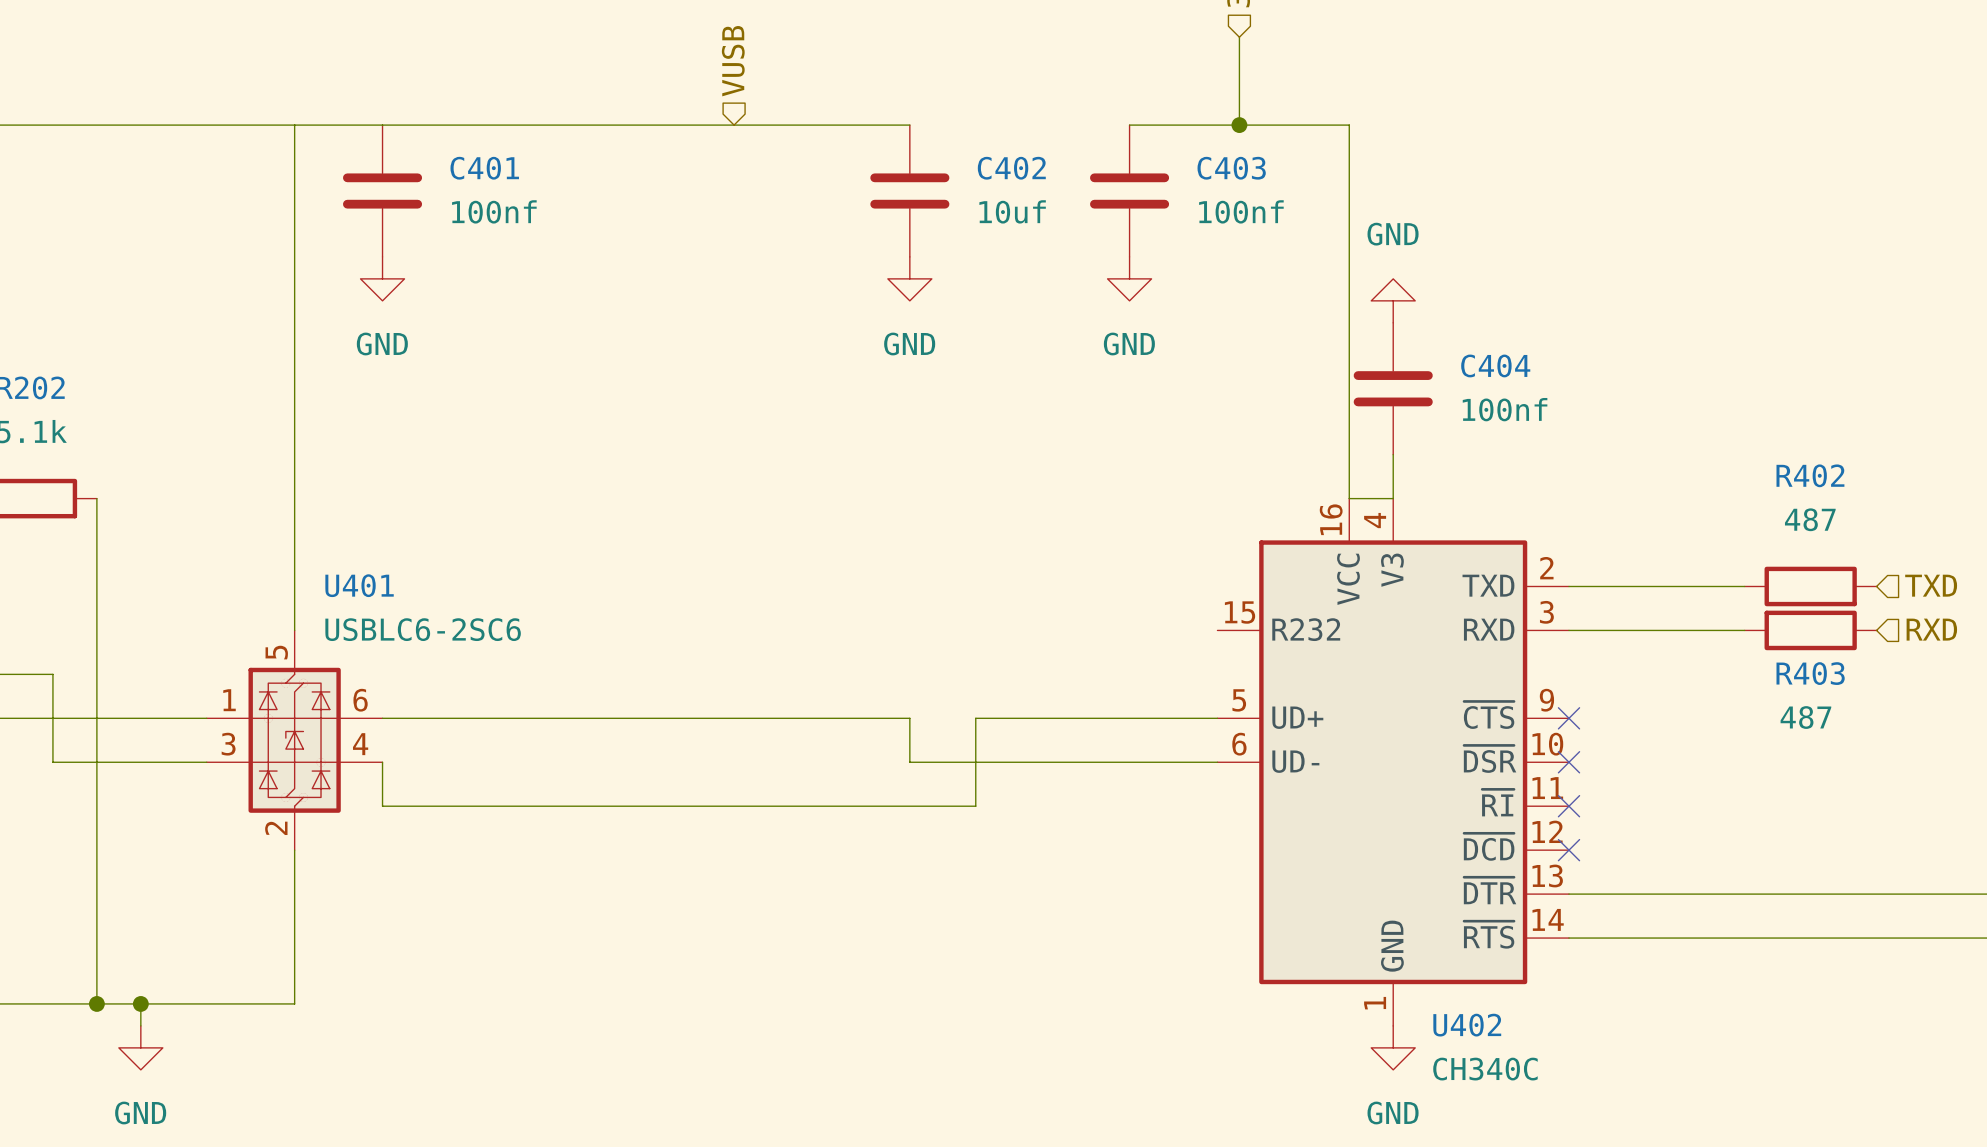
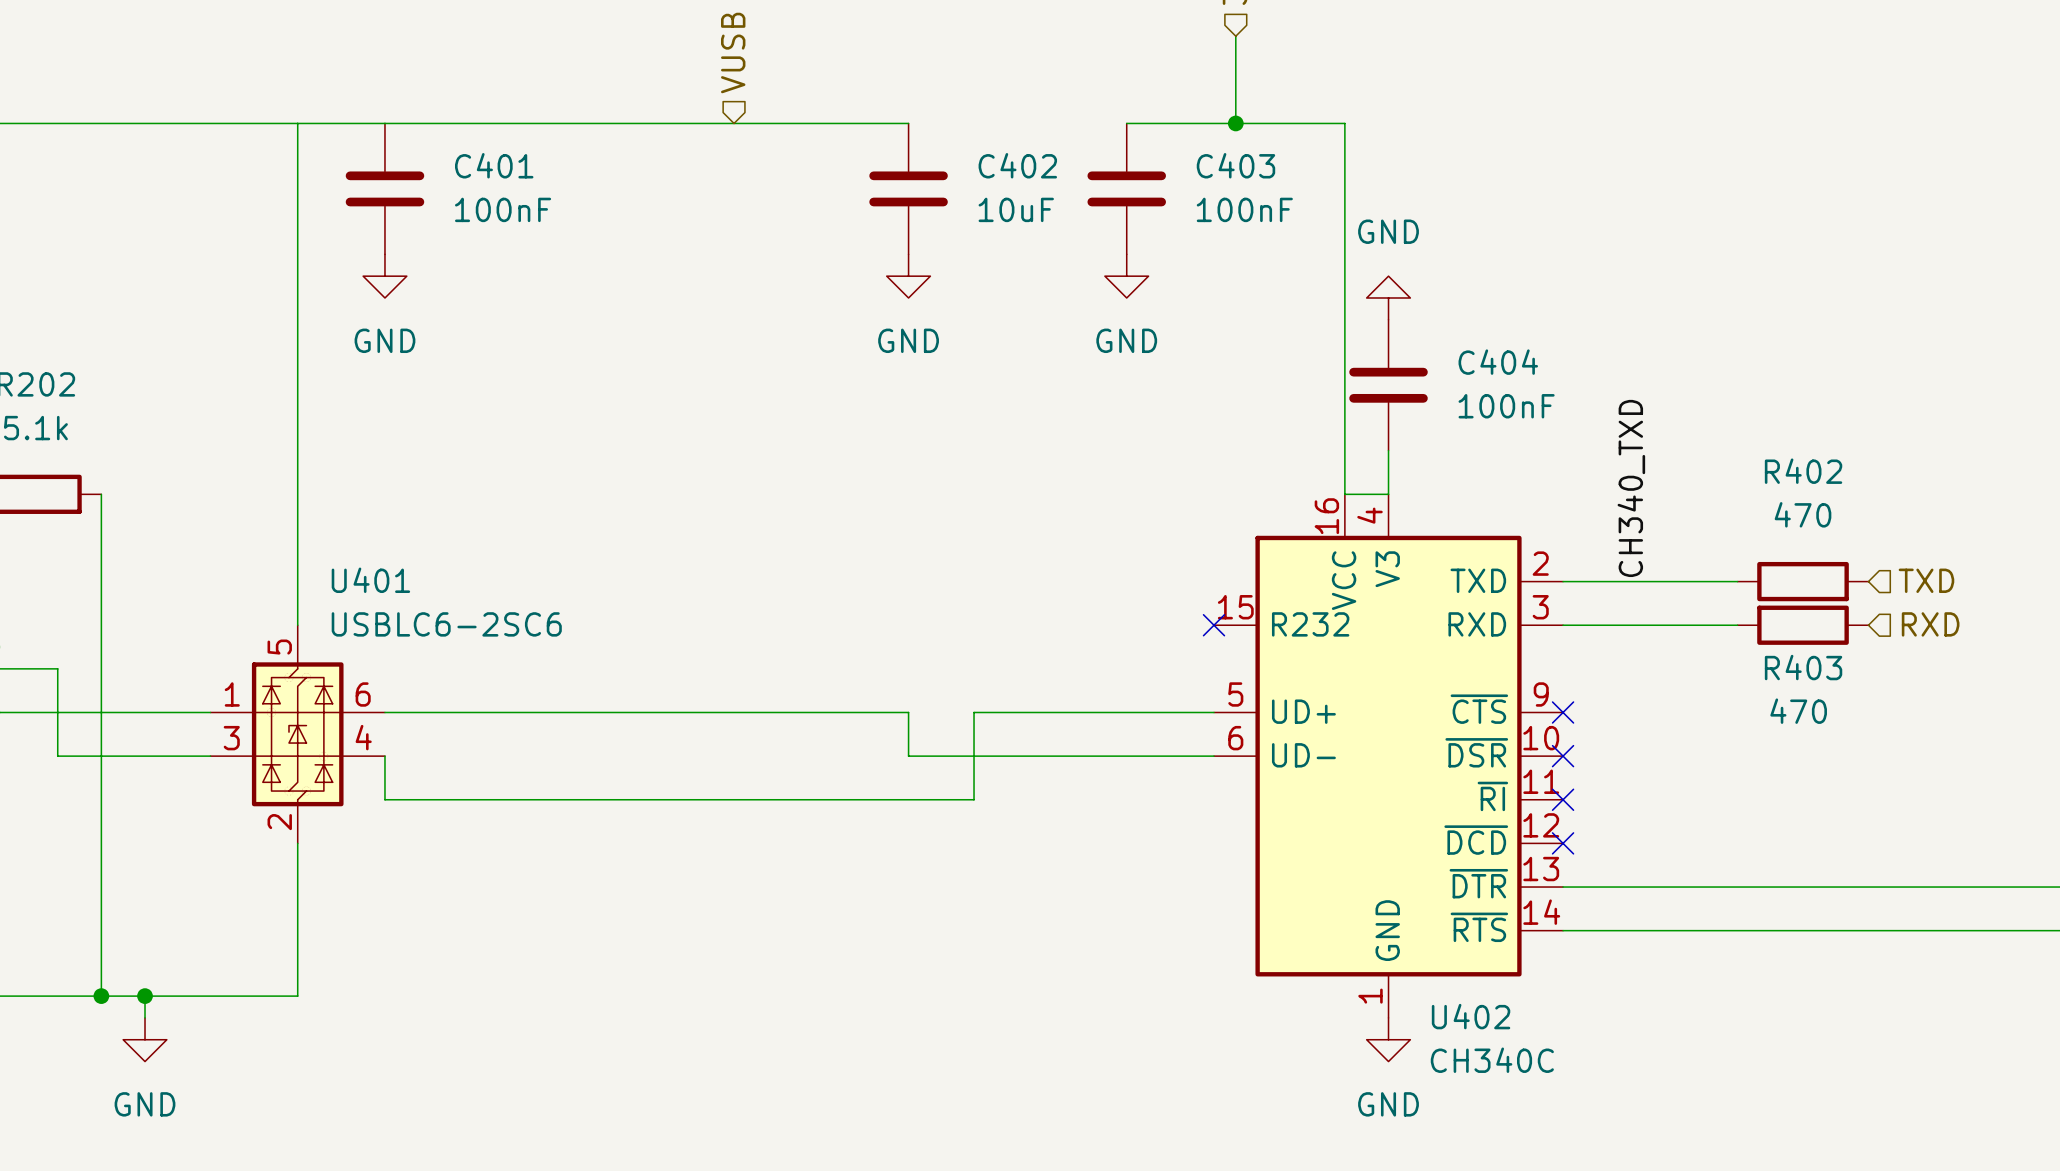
C401 value: 100nf (494, 211) -> 100nF (503, 209)
C402 value: 10uf (1012, 211) -> 10uF (1016, 209)
C403 value: 100nf (1241, 211) -> 100nF (1244, 209)
C404 value: 100nf (1505, 409) -> 100nF (1506, 406)
label: none -> CH340_TXD (1631, 488)
R402 value: 487 (1810, 519) -> 470 (1803, 514)
no-connect mark: none -> (1213, 625)
R403 value: 487 (1805, 717) -> 470 (1798, 711)

